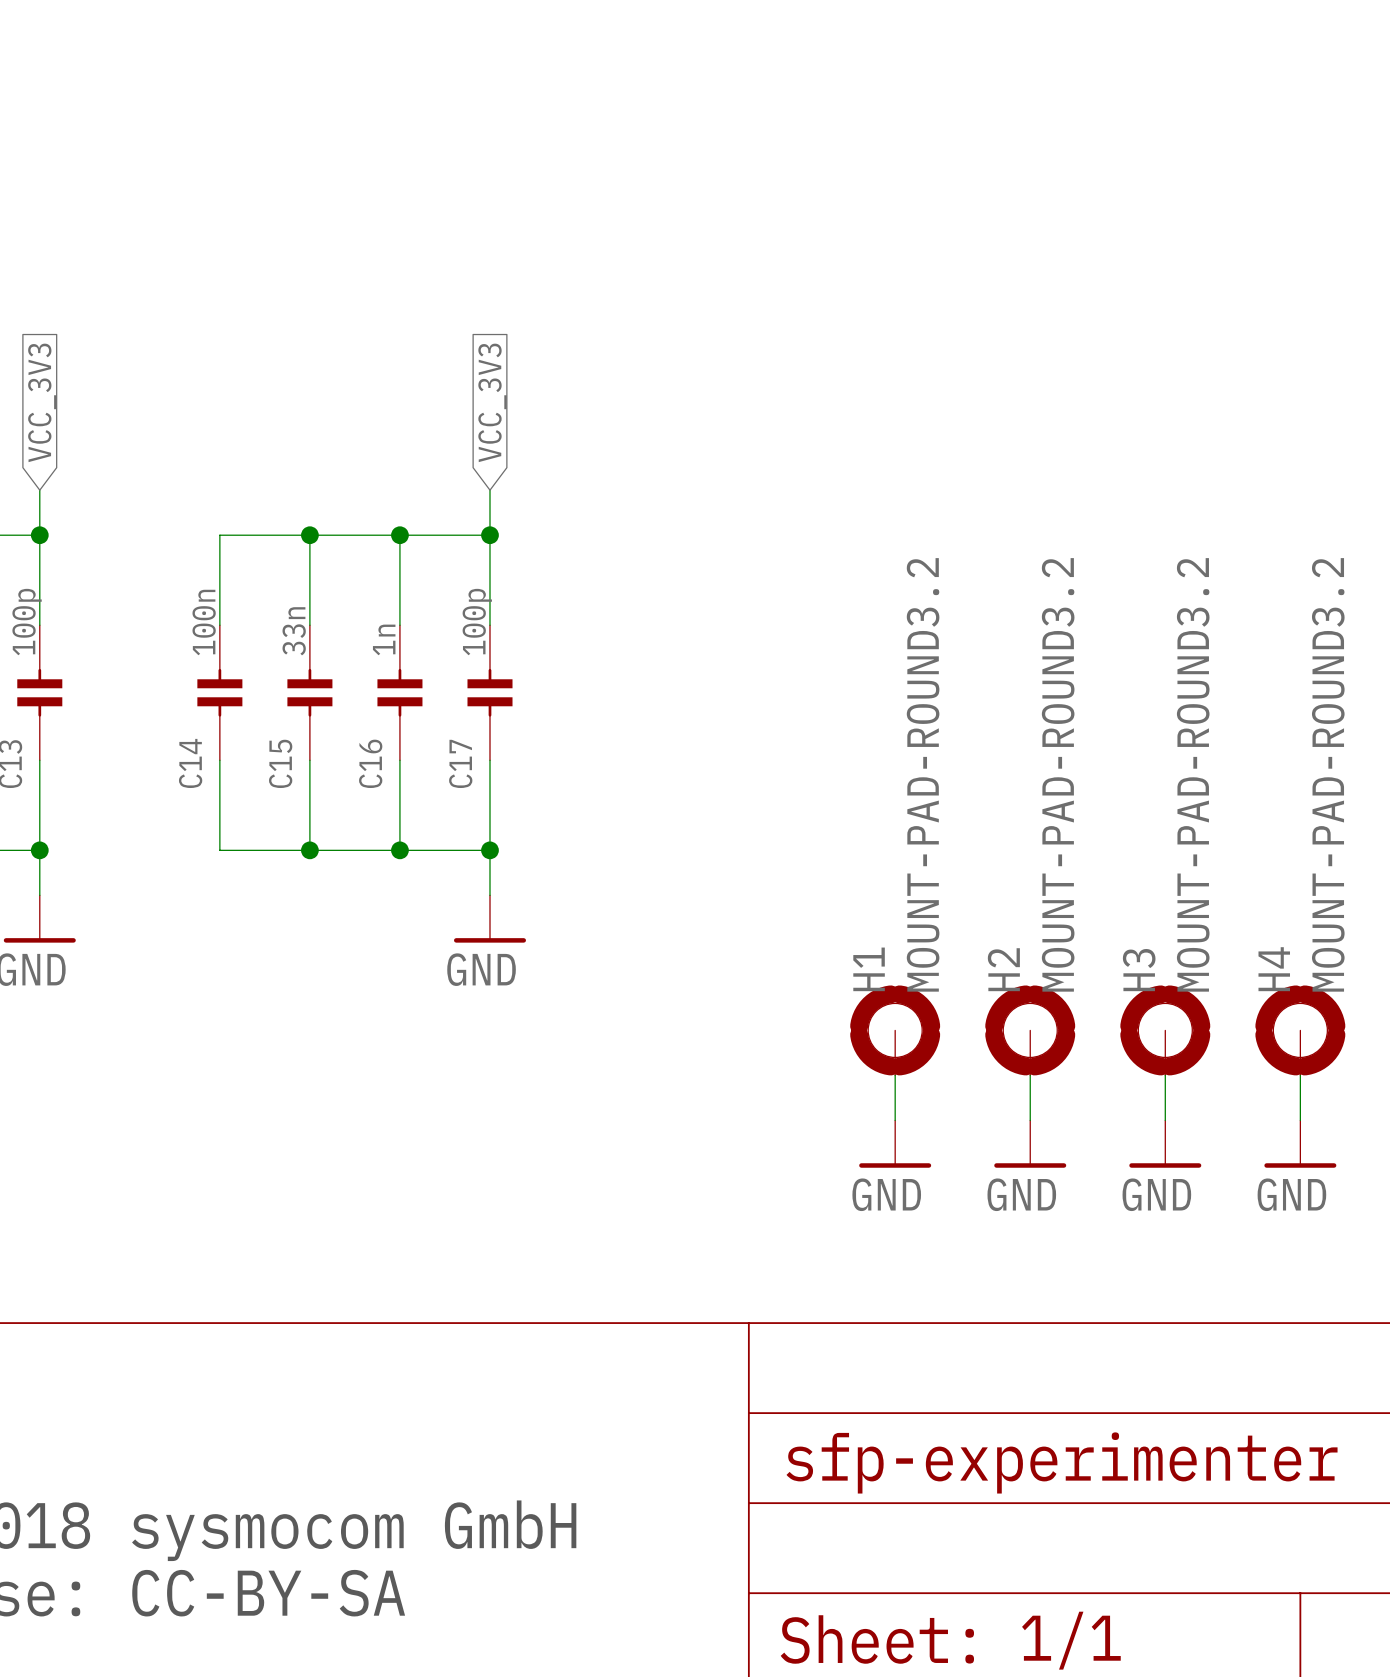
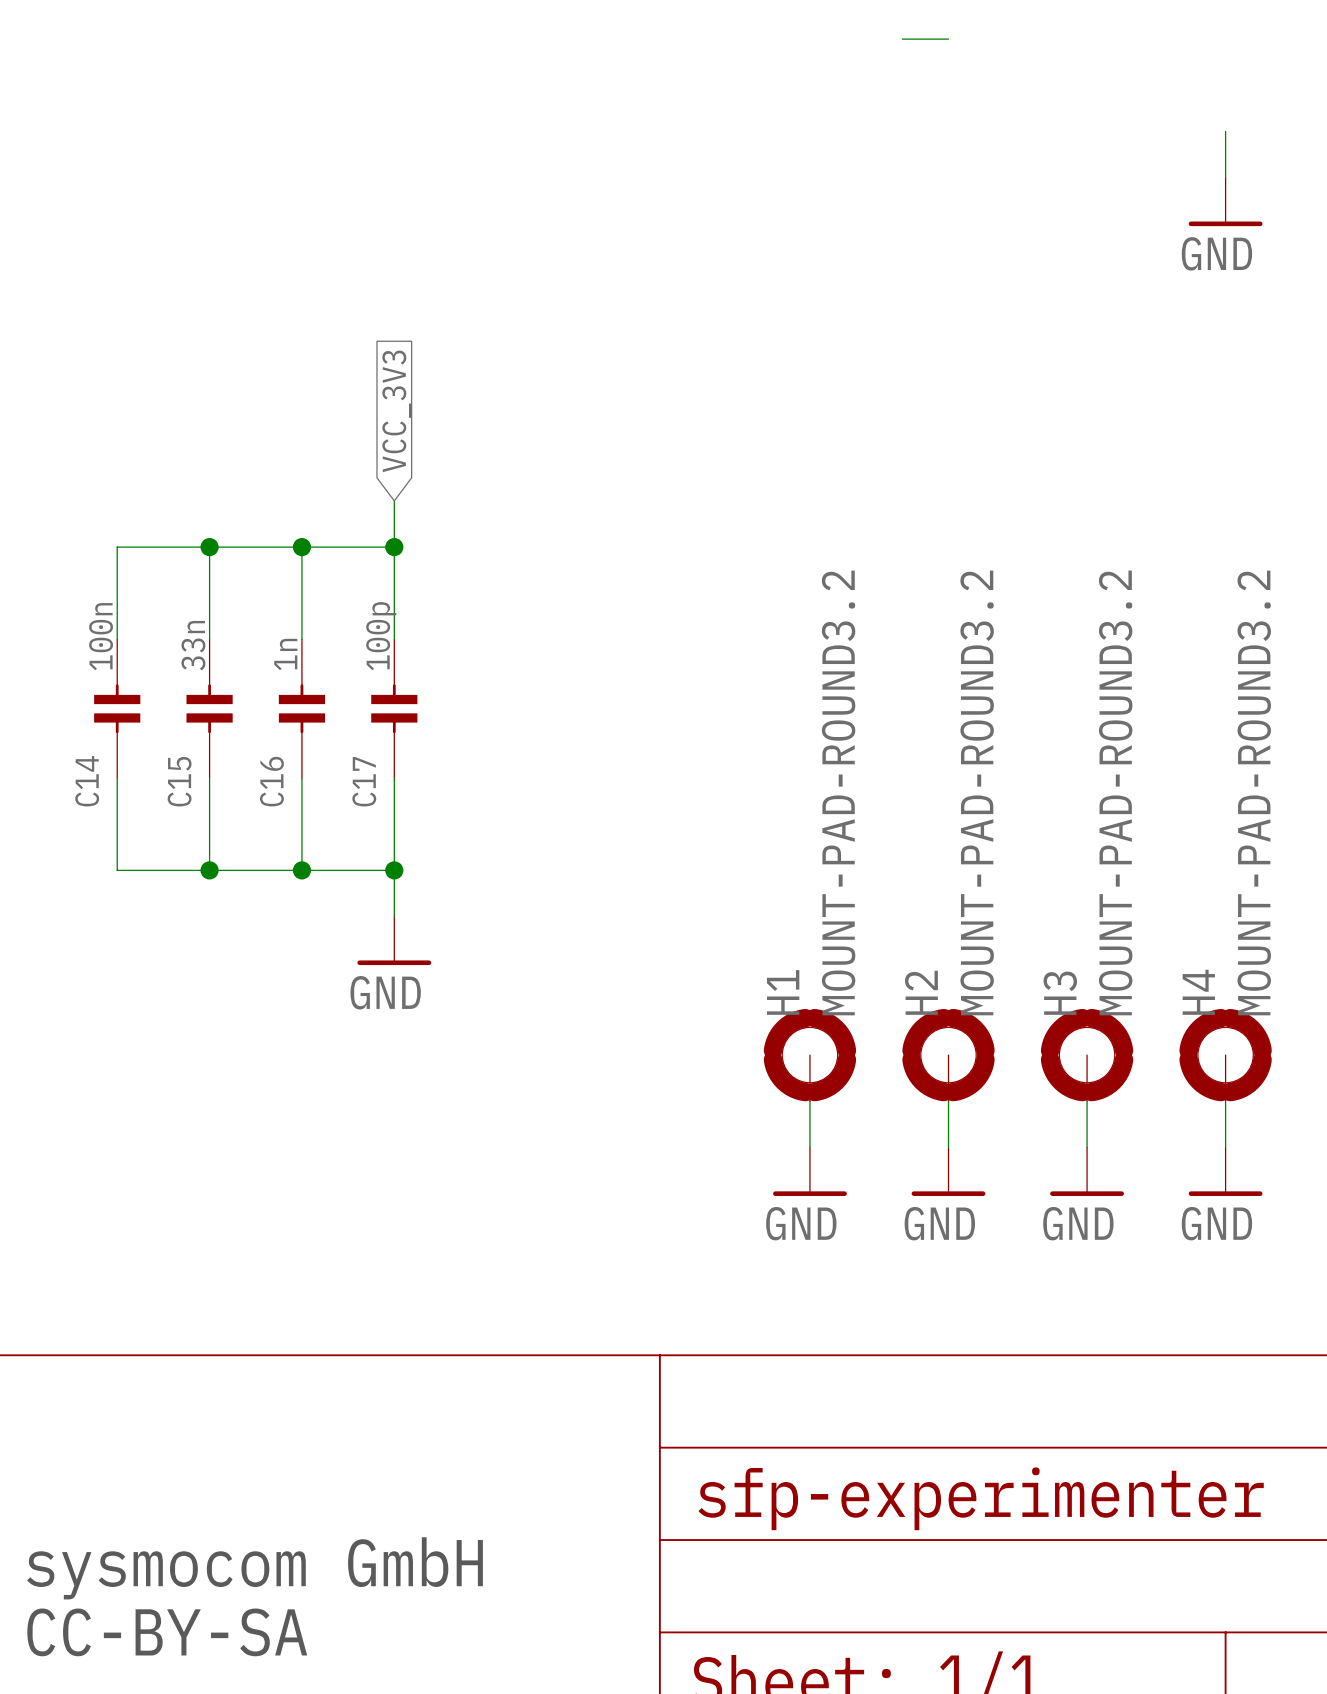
wire: none -> (902, 39) (948, 39)
wire: none -> (1225, 131) (1225, 177)
power symbol: none -> GND (1225, 201)

